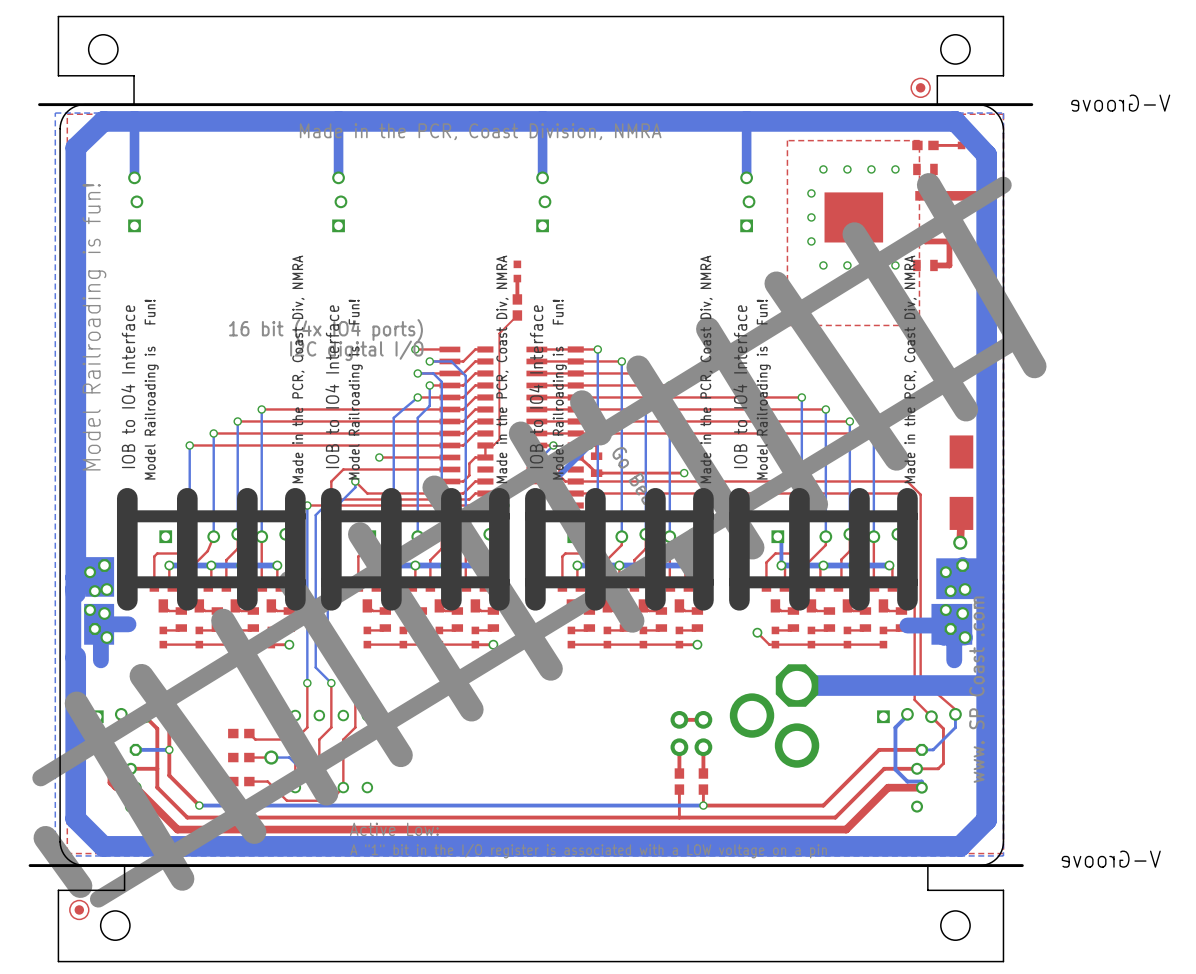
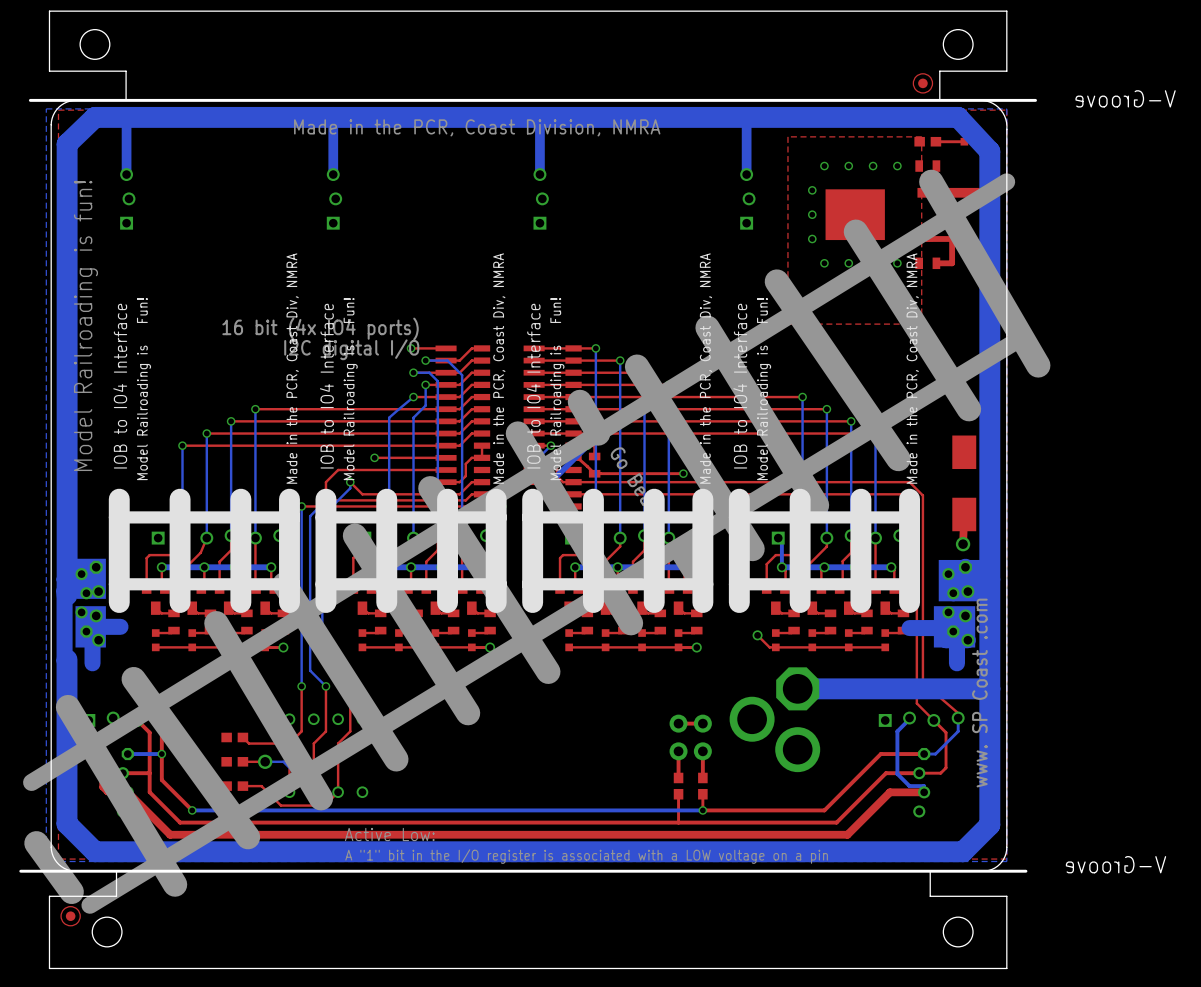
part: (517, 271) -> none
top track: (517, 278) (517, 299) -> none
part: (517, 307) -> none
top track: (517, 315) (499, 333) (499, 439) (493, 445) (485, 445) -> none

